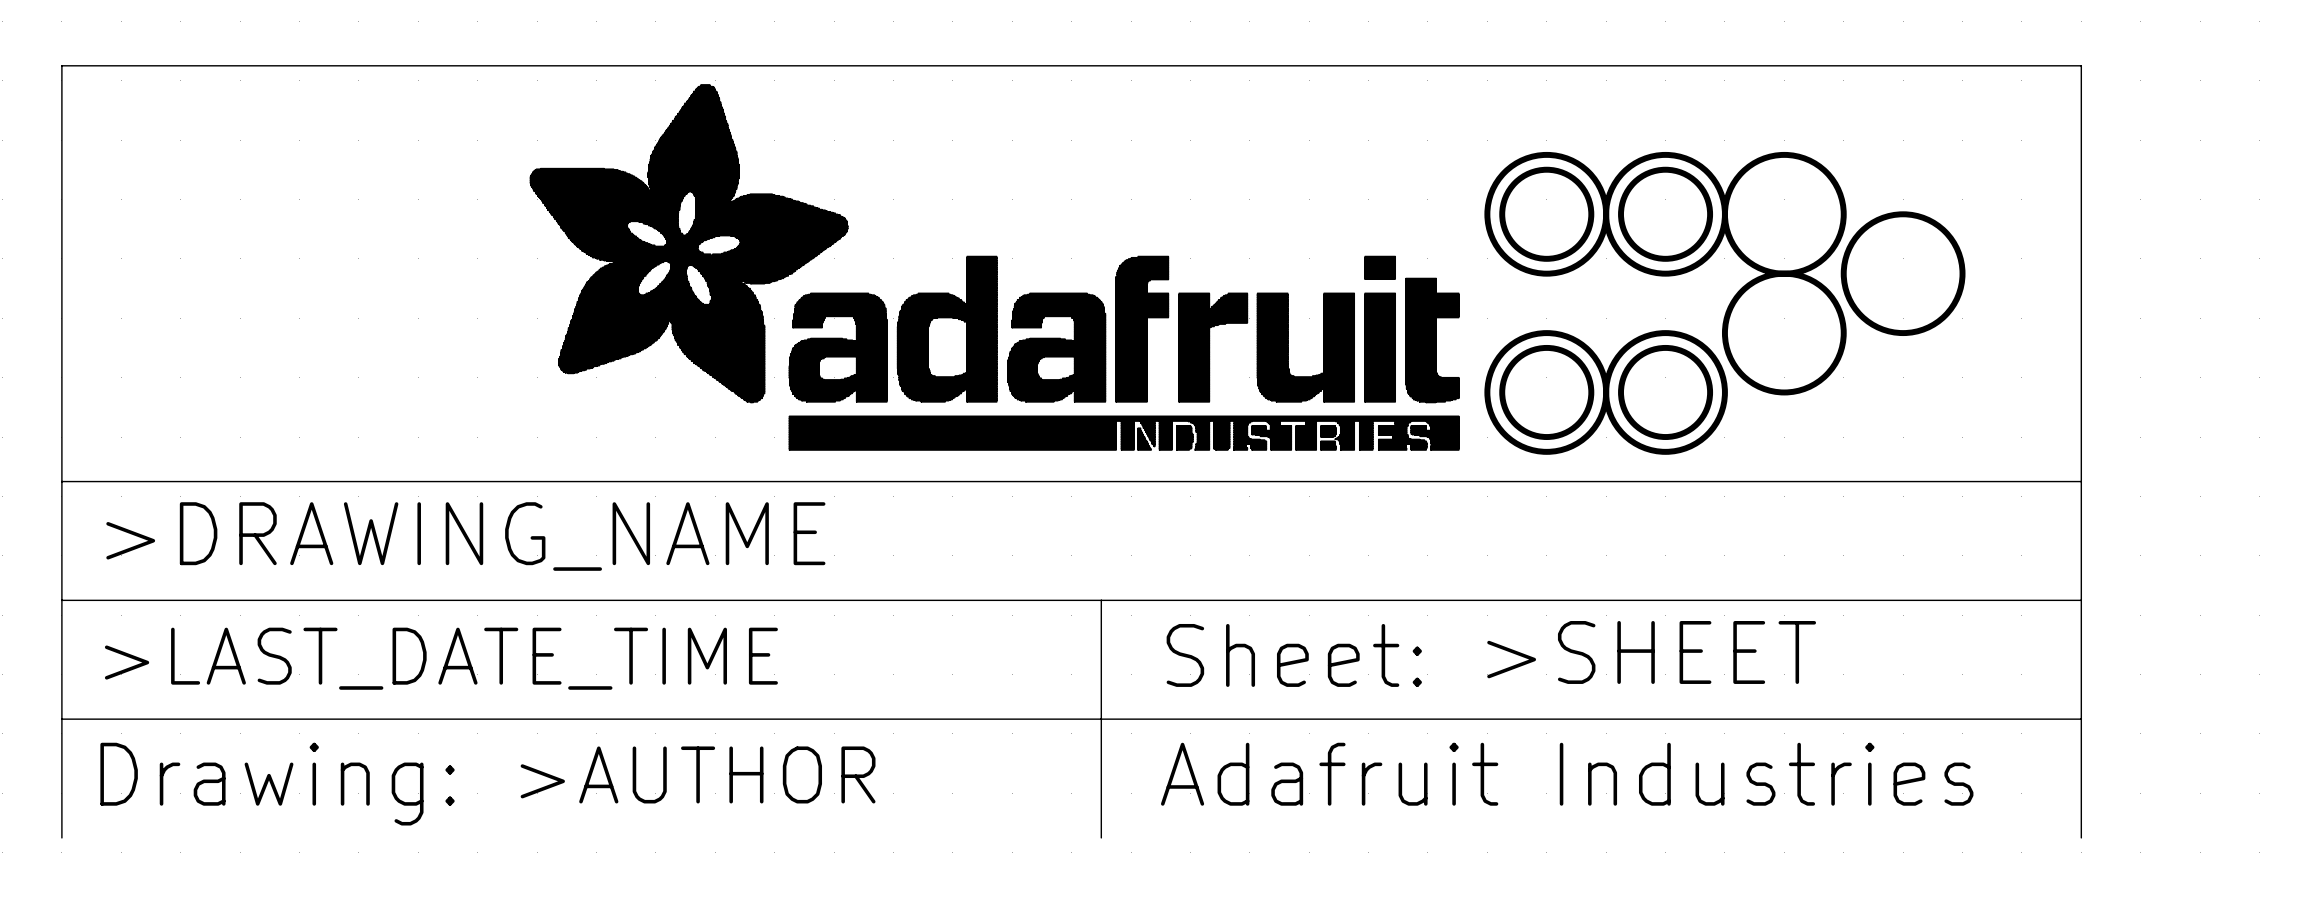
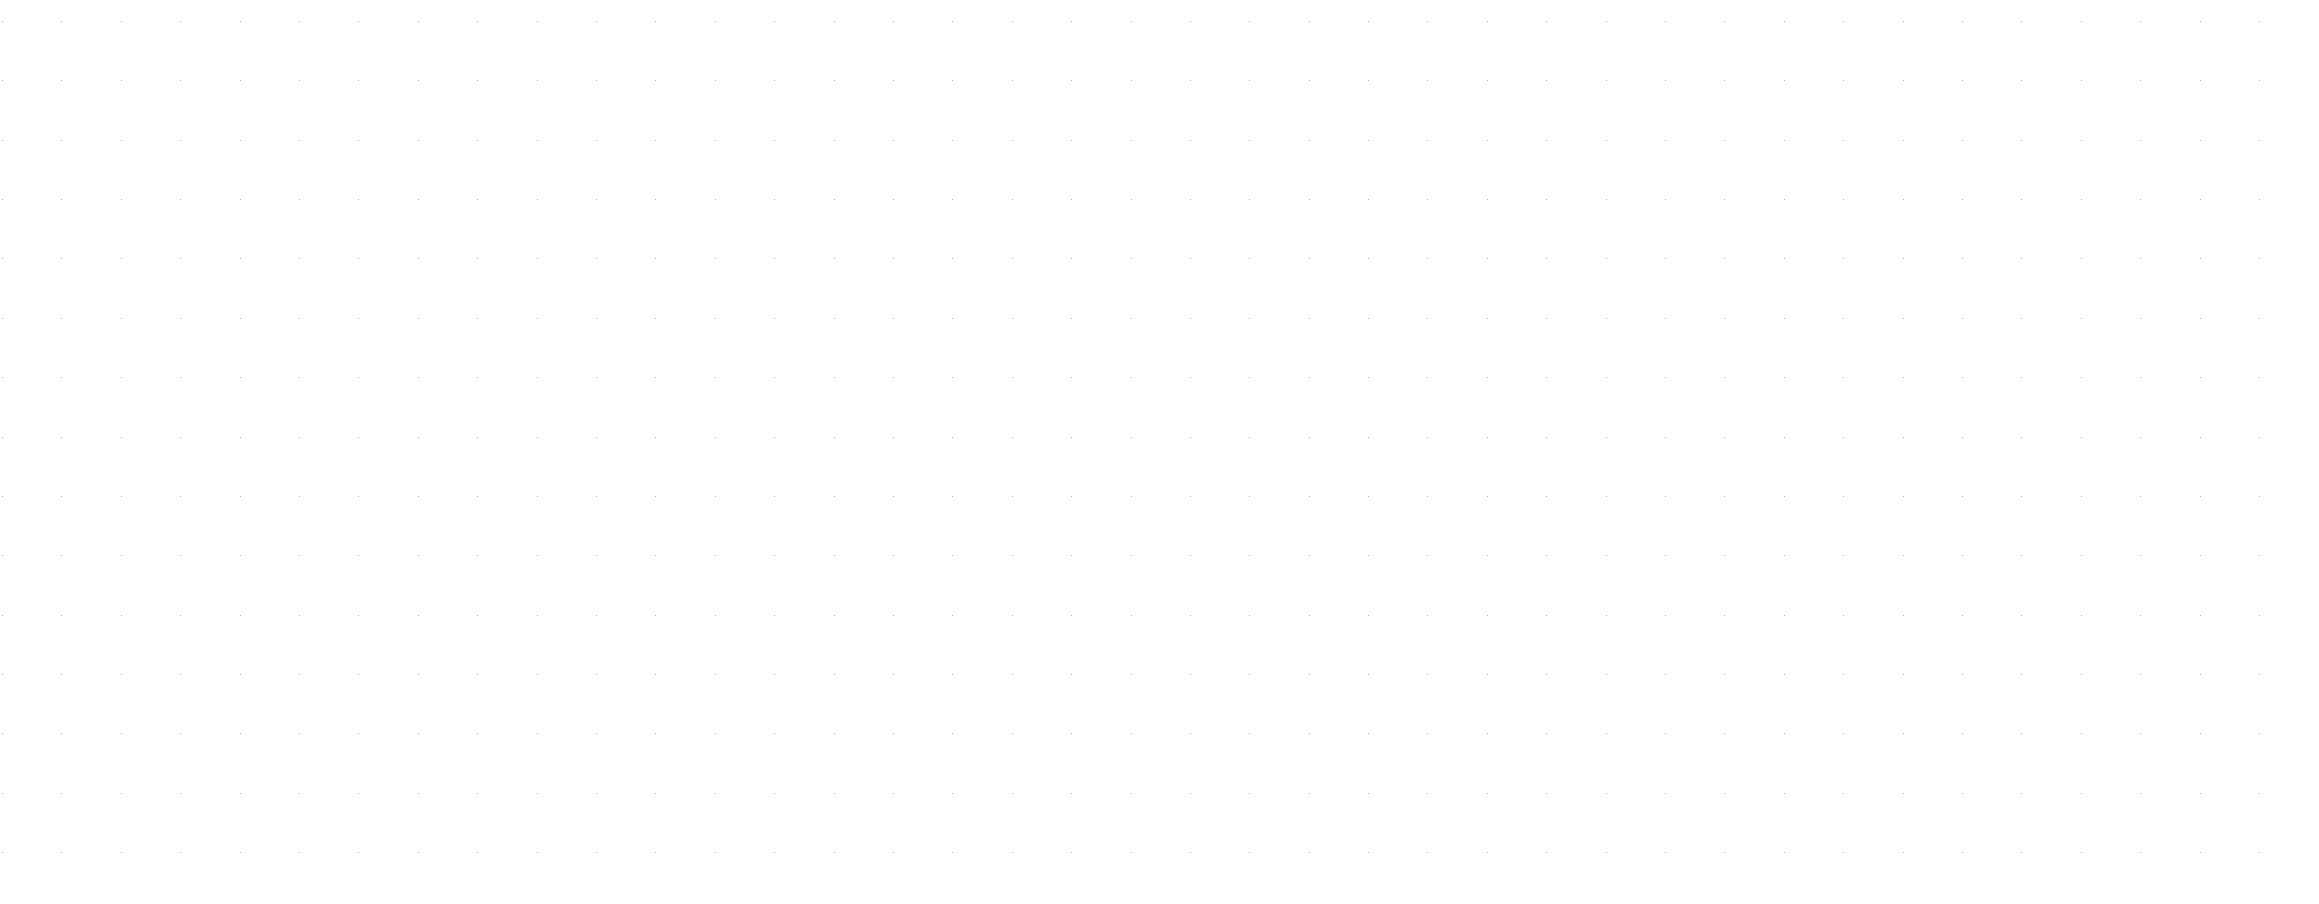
part: (1546, 214) -> none
part: (1665, 214) -> none
part: (1784, 214) -> none
part: (1903, 273) -> none
part: (1784, 333) -> none
part: (1546, 392) -> none
part: (1665, 392) -> none
power symbol: (1071, 451) -> none

